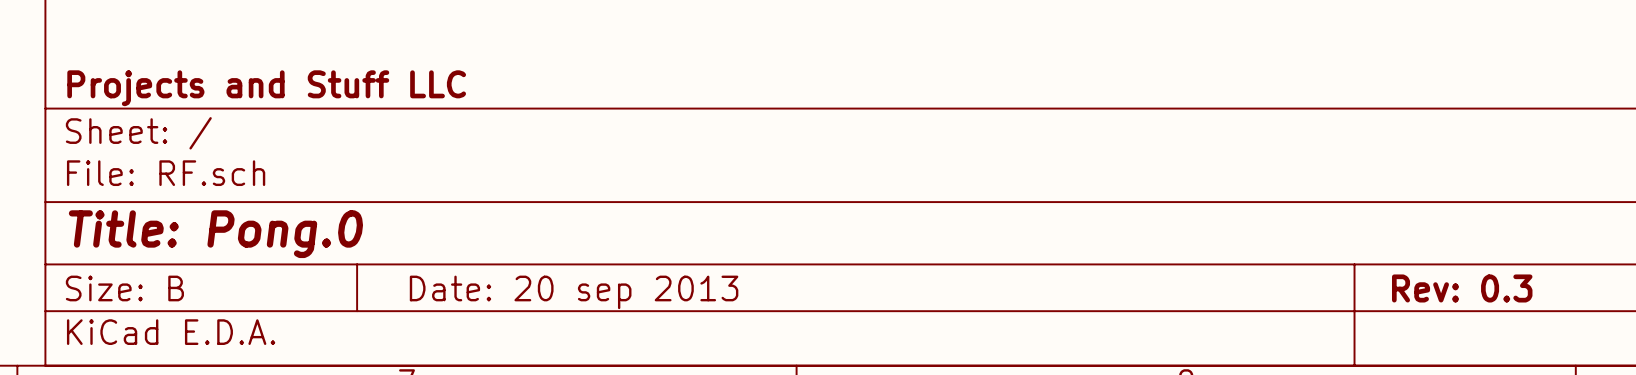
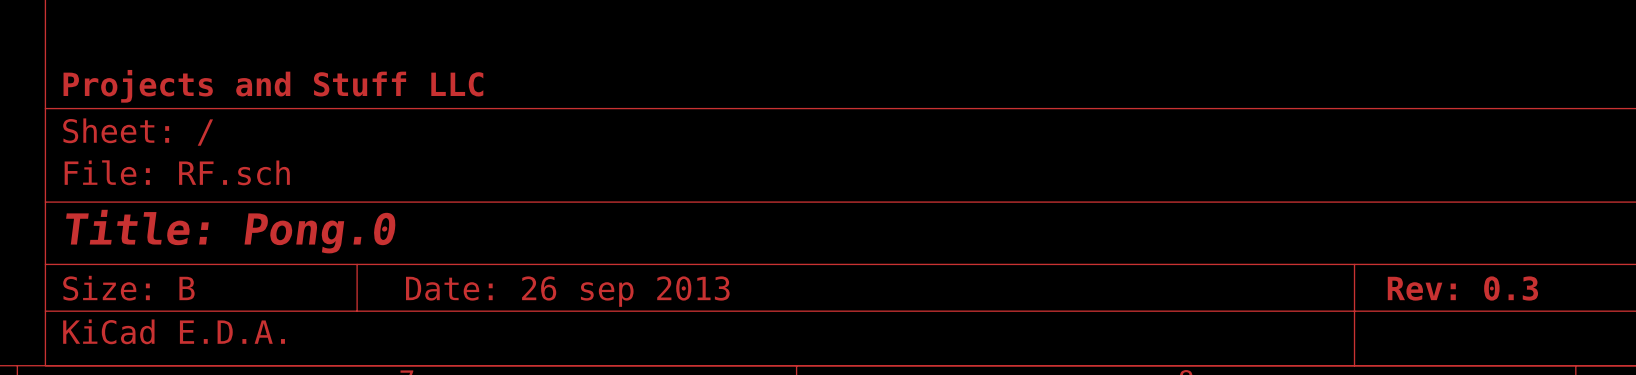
title block: Date: 20 sep 2013 (574, 292) -> Date: 26 sep 2013 (567, 291)

